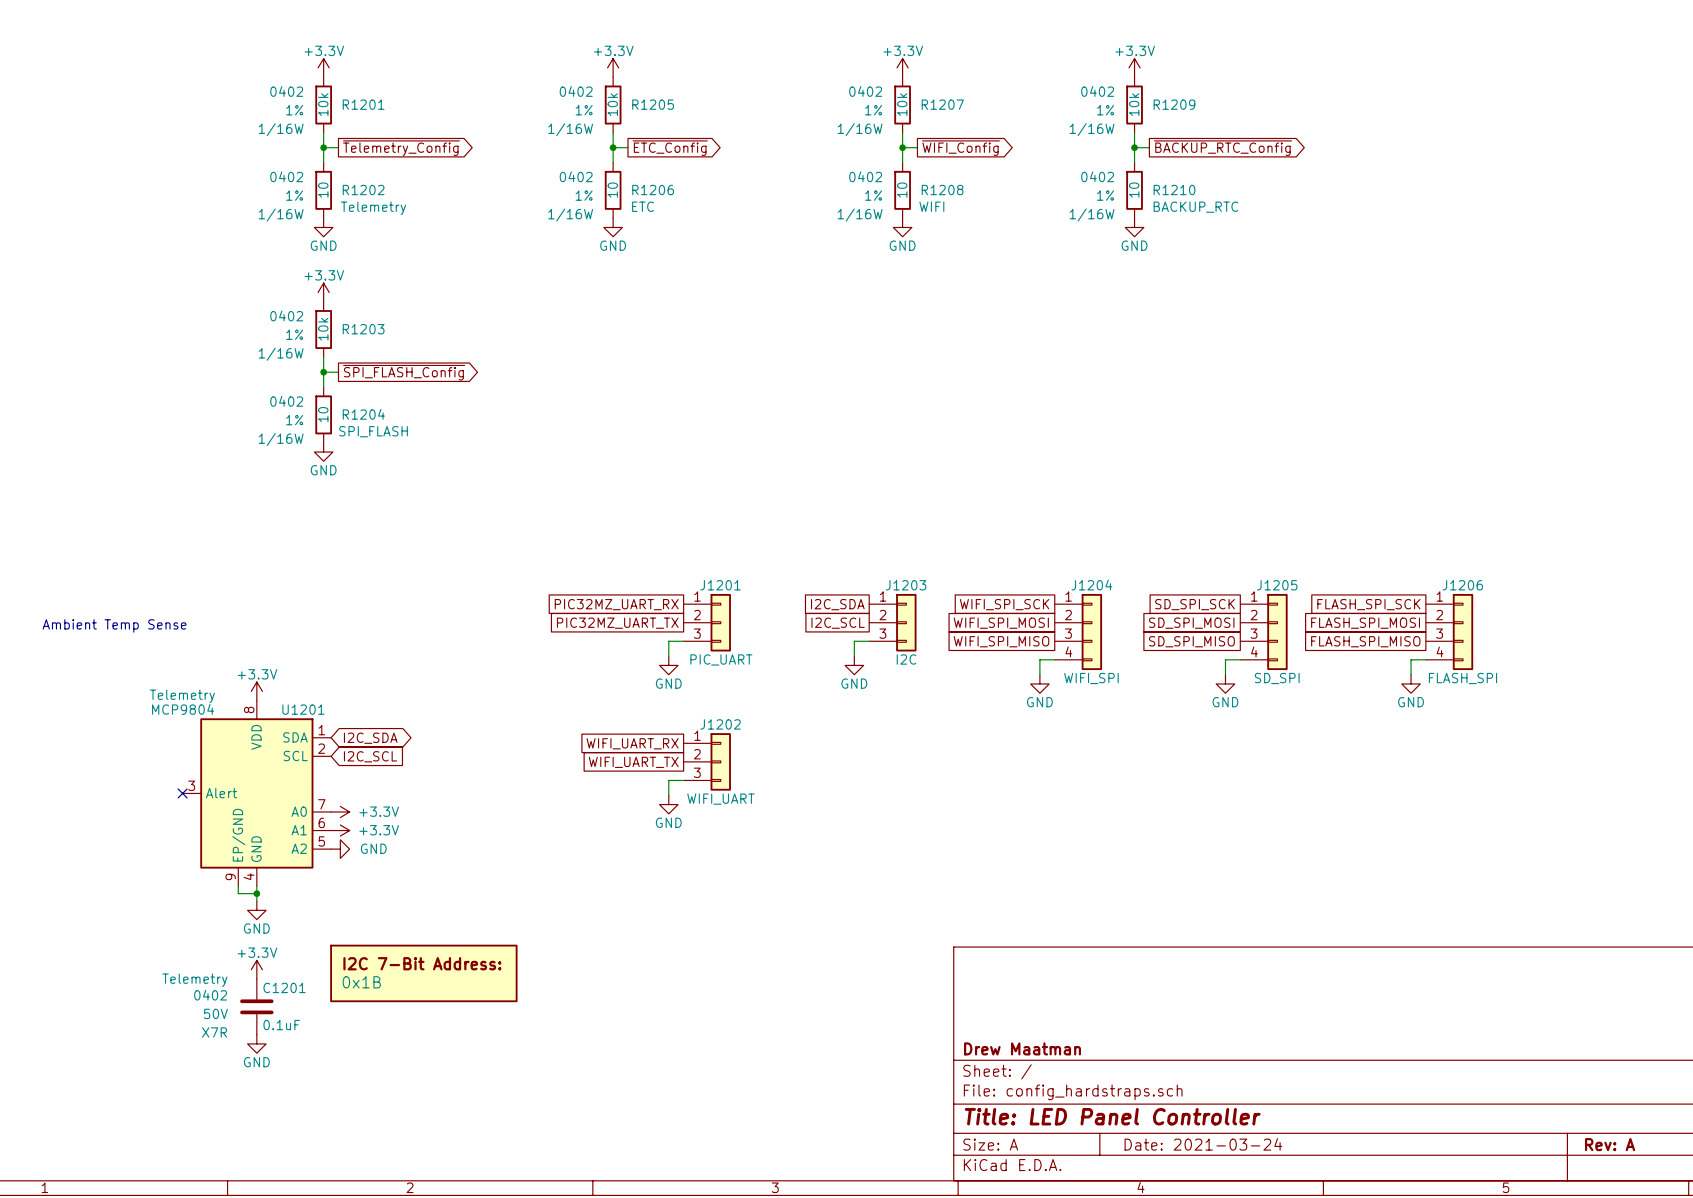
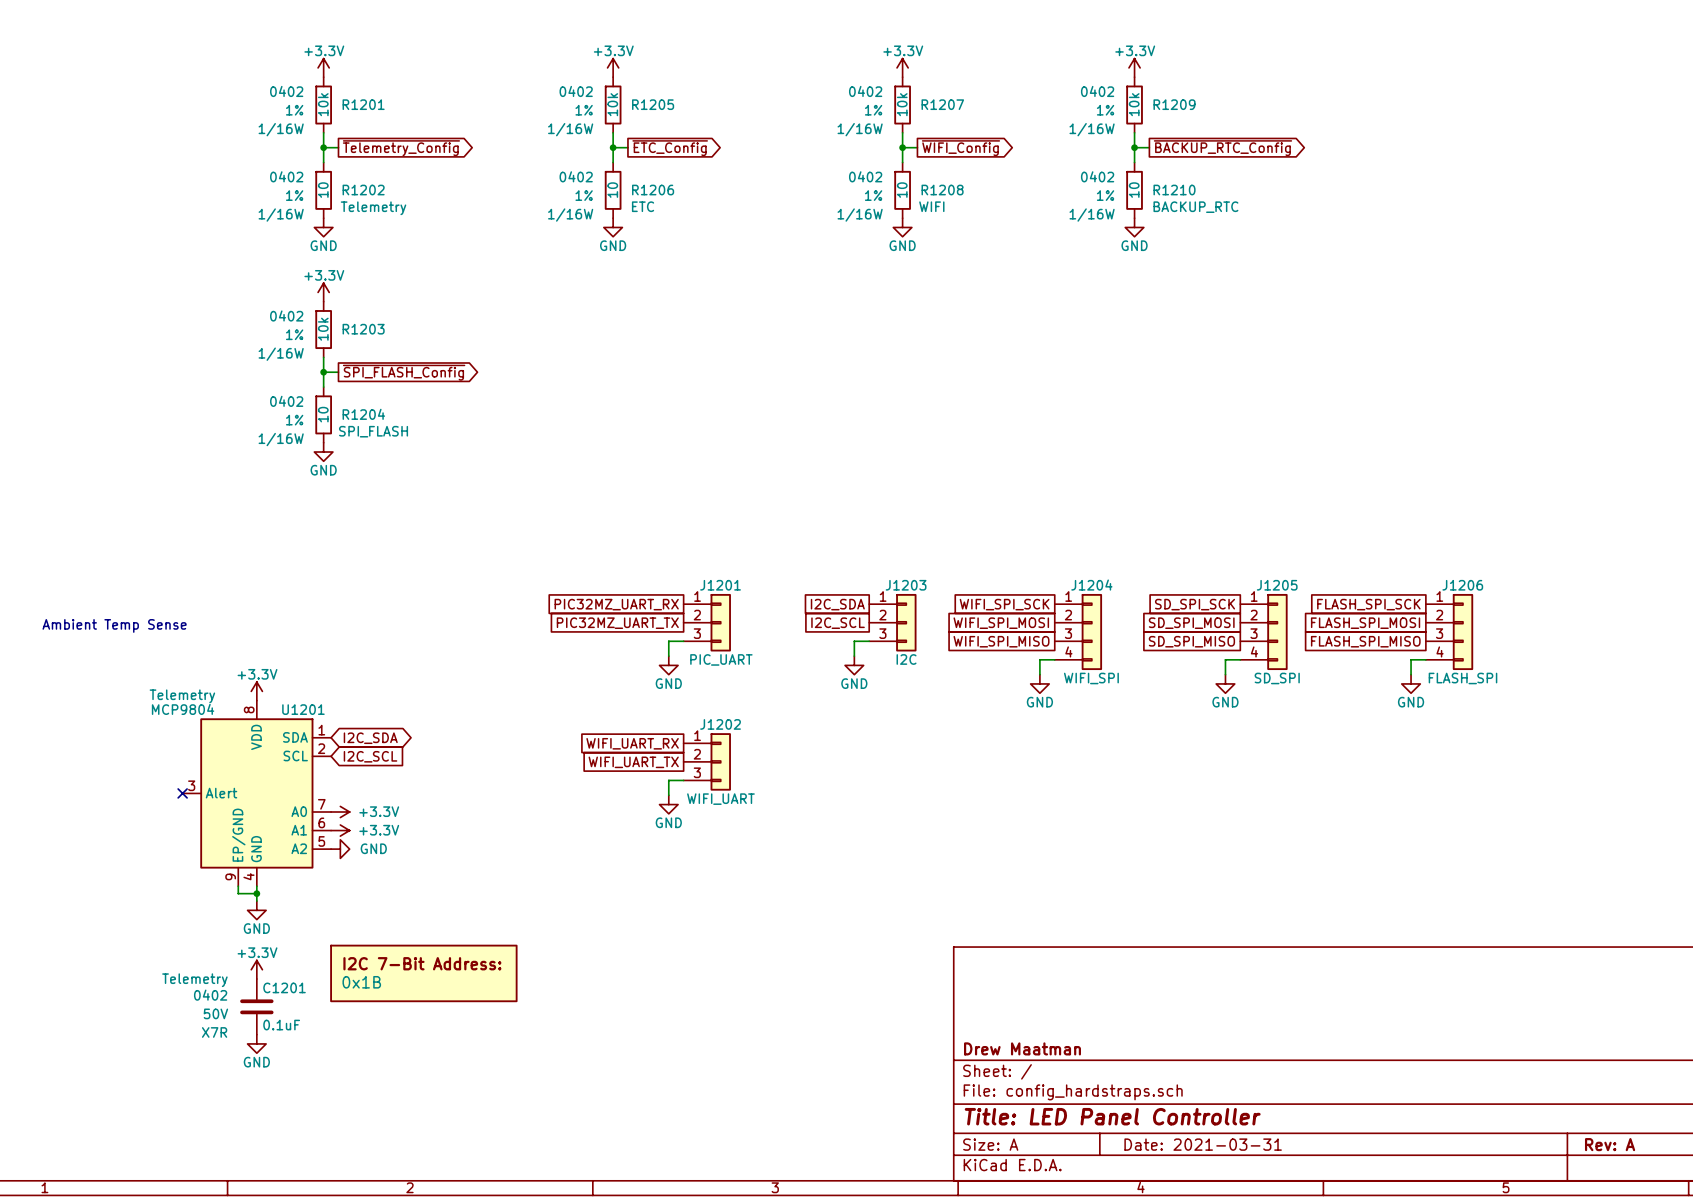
title block: Date: 2021-03-24 (1203, 1144) -> Date: 2021-03-31 (1203, 1144)

